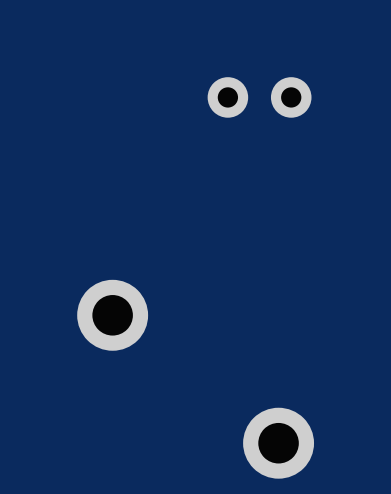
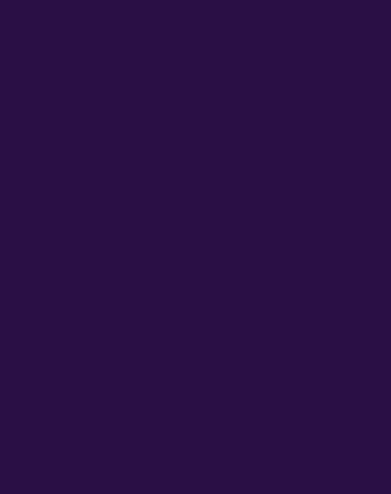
part: (259, 97) -> none
part: (112, 315) -> none
part: (278, 443) -> none

